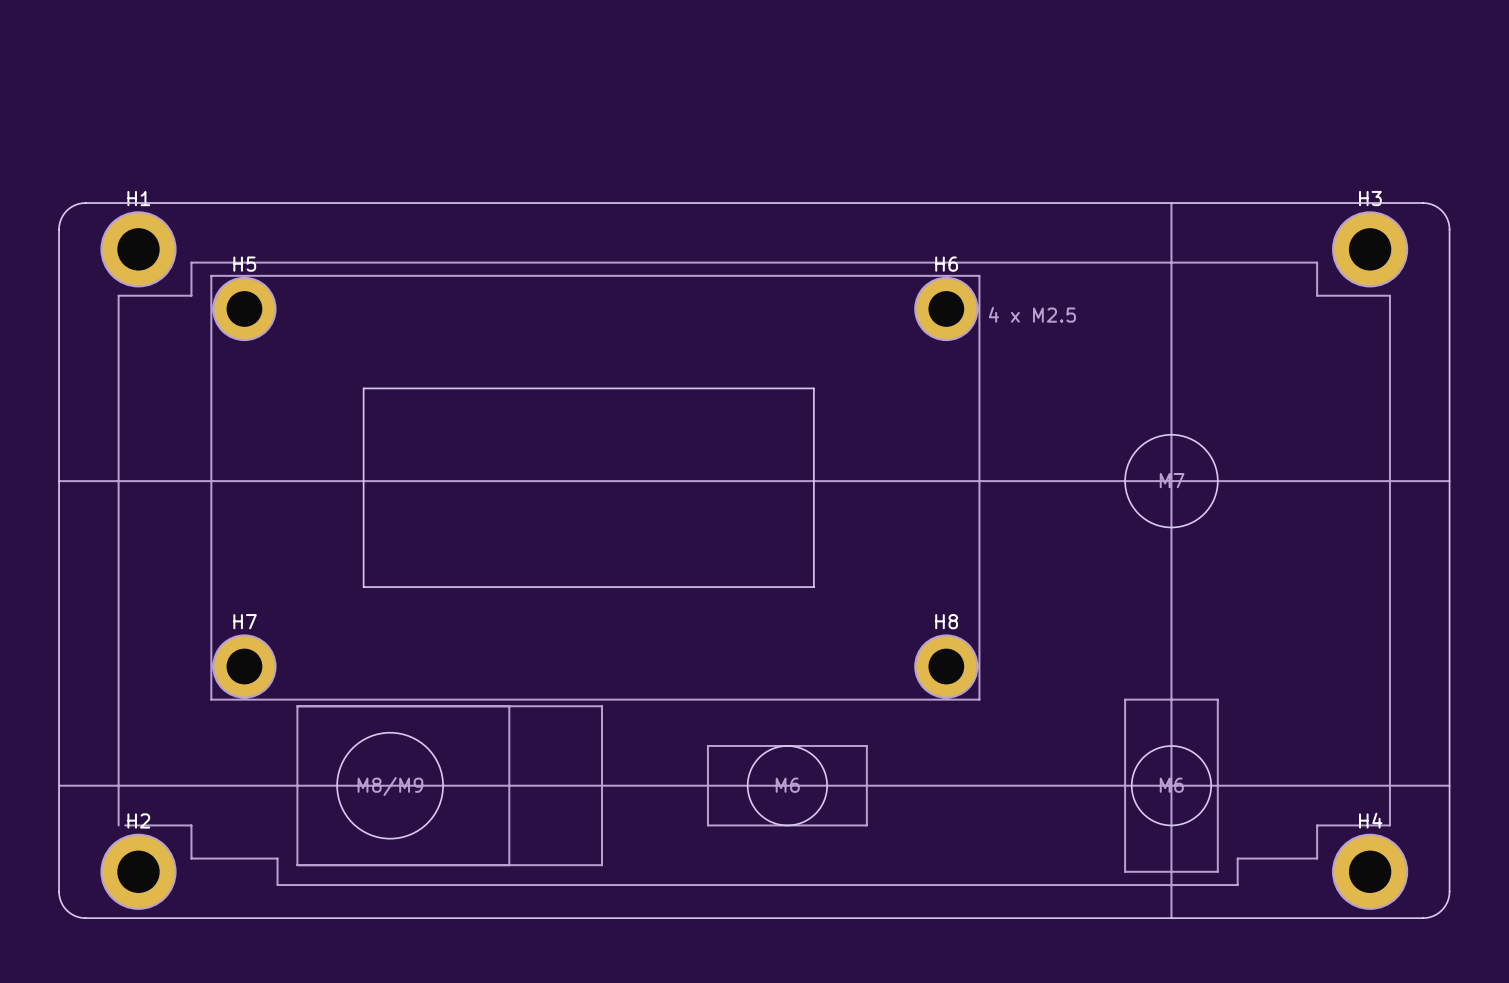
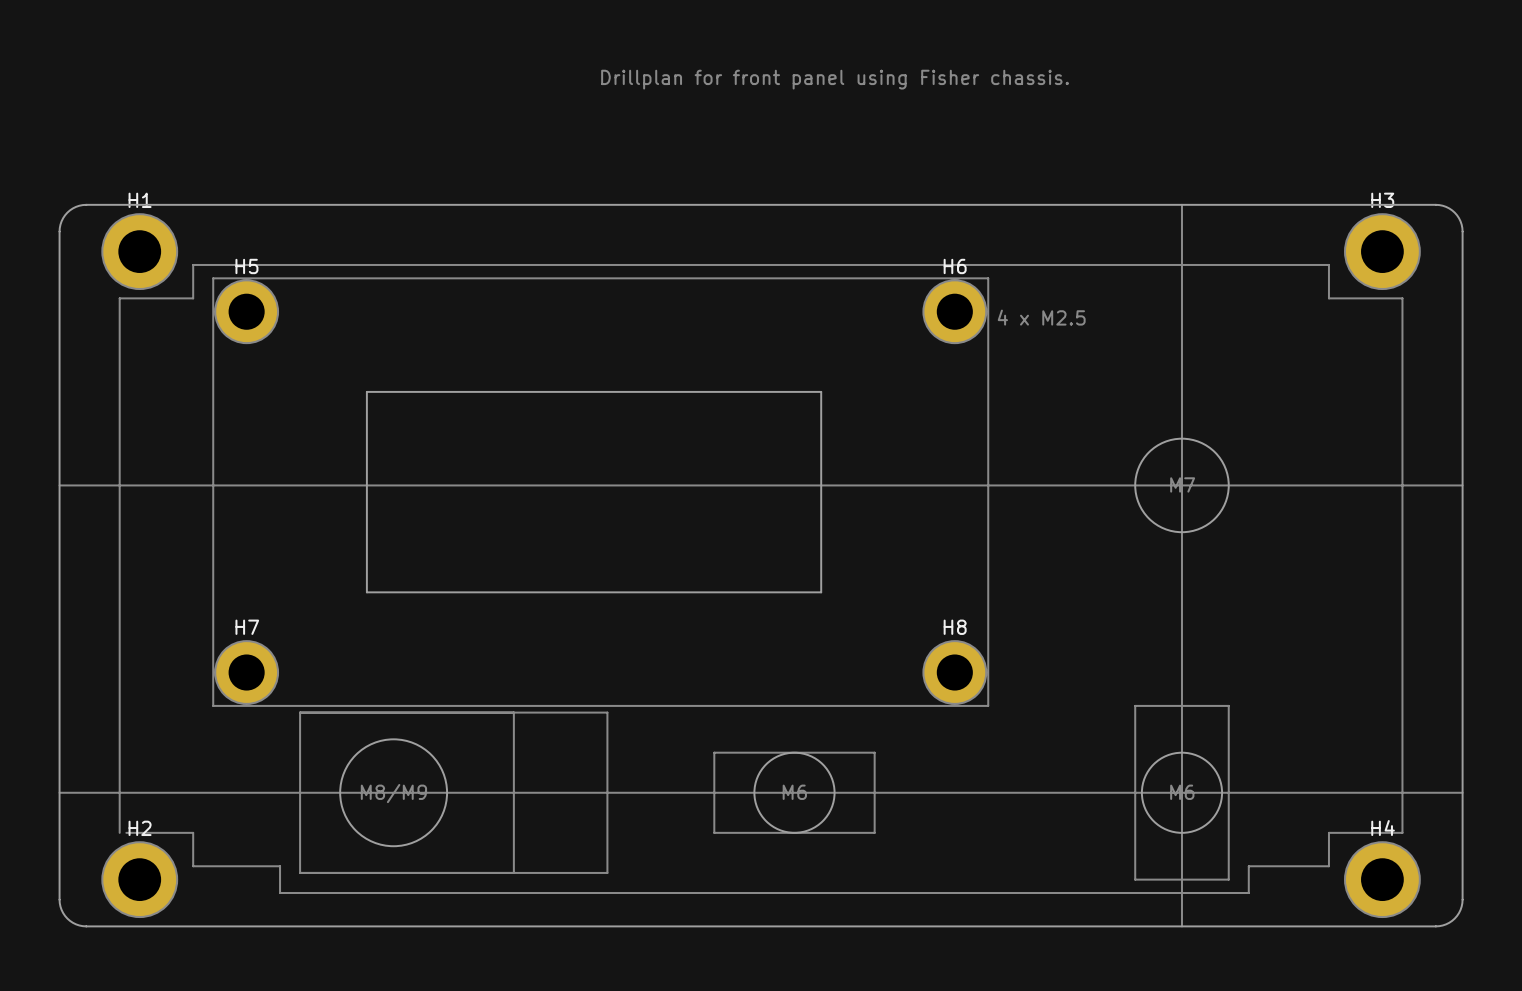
text: none -> Drillplan for front panel using Fisher chassis. (835, 79)

